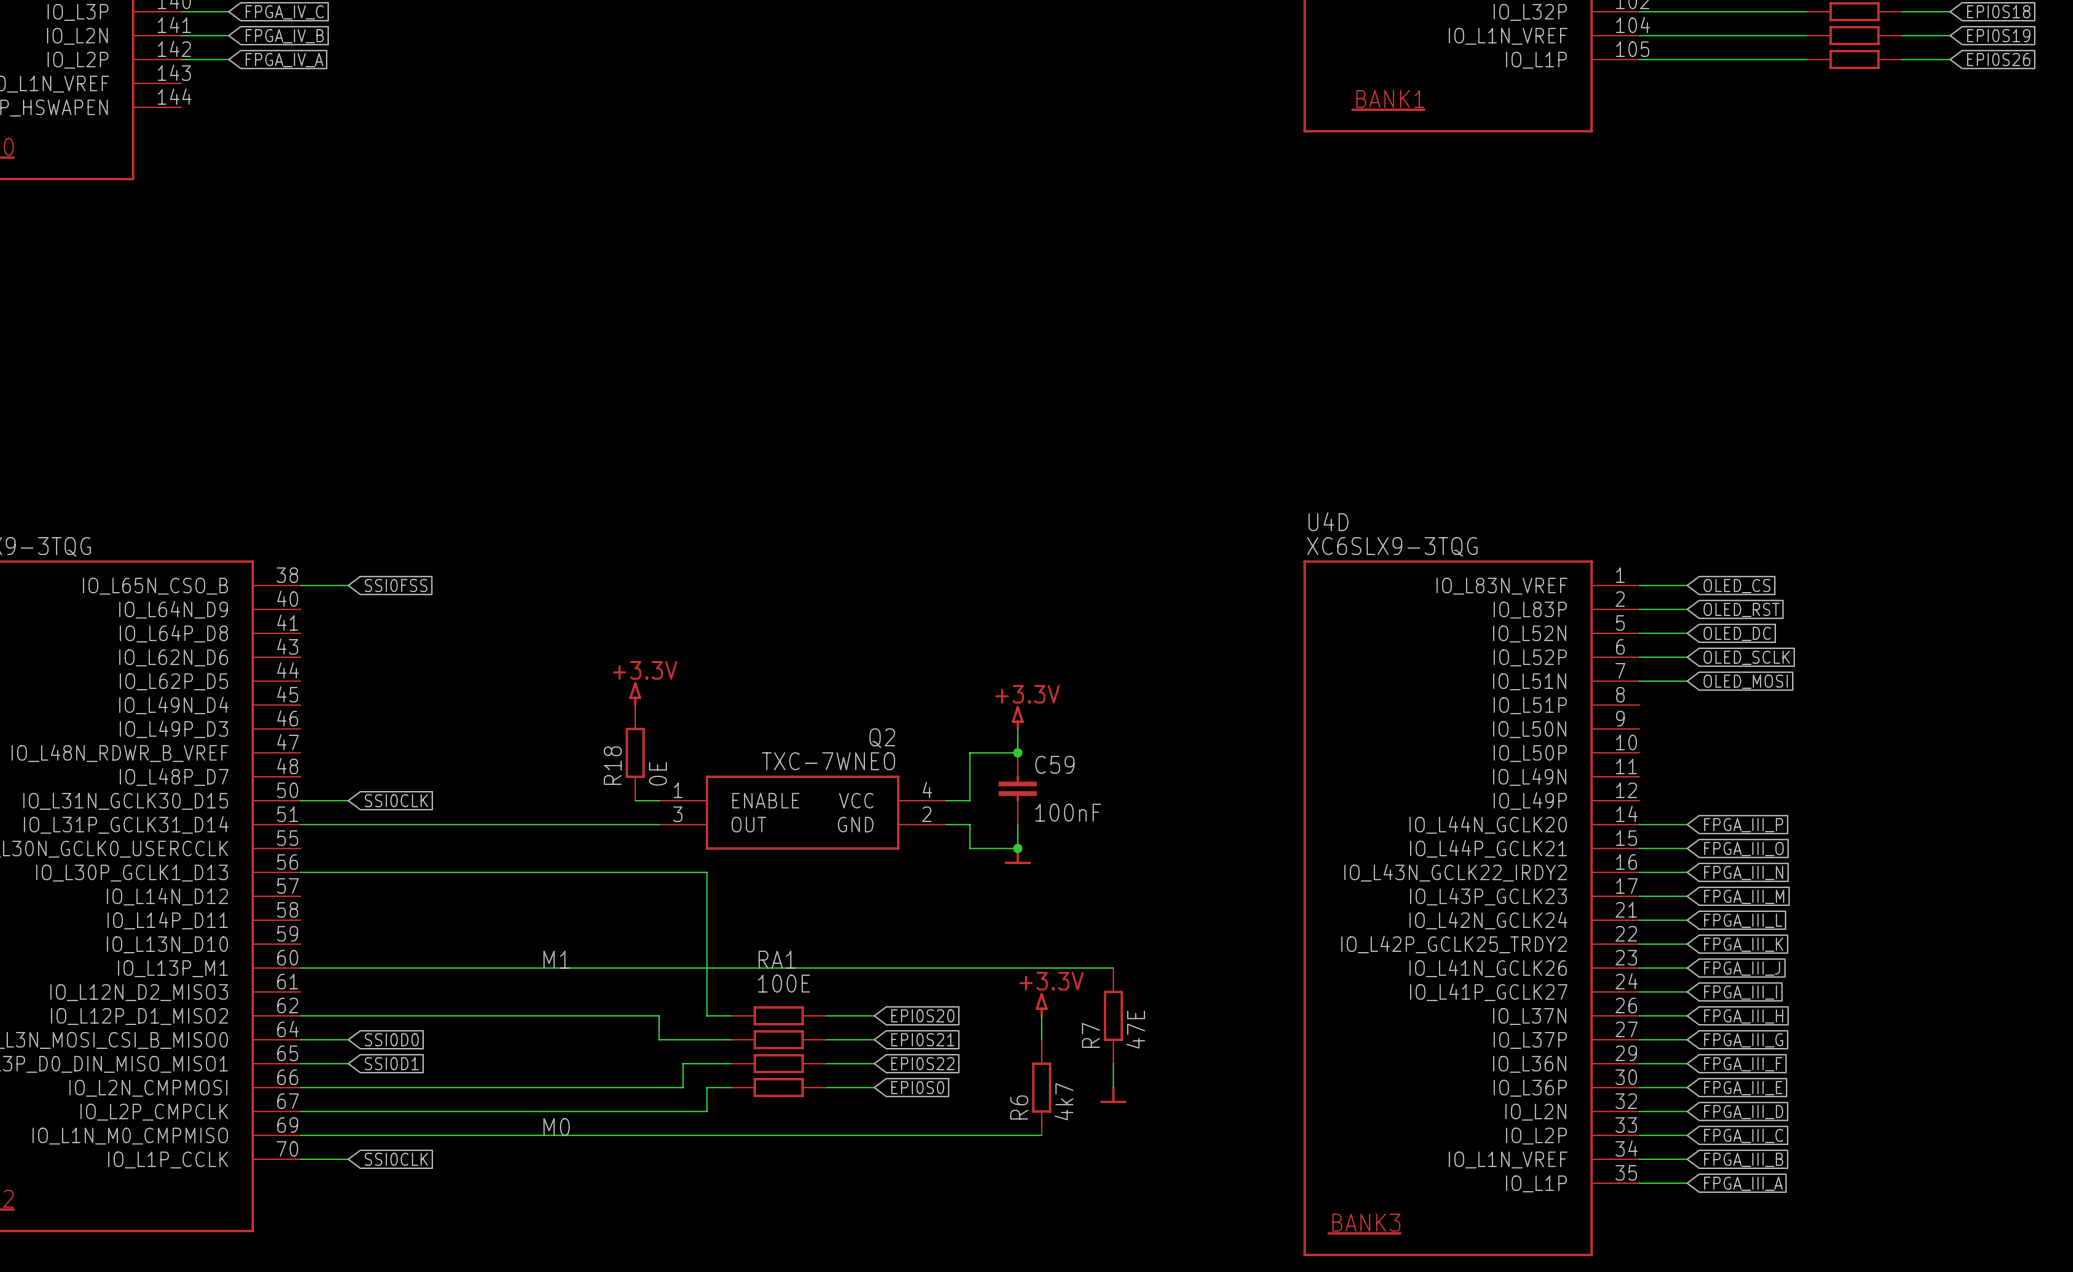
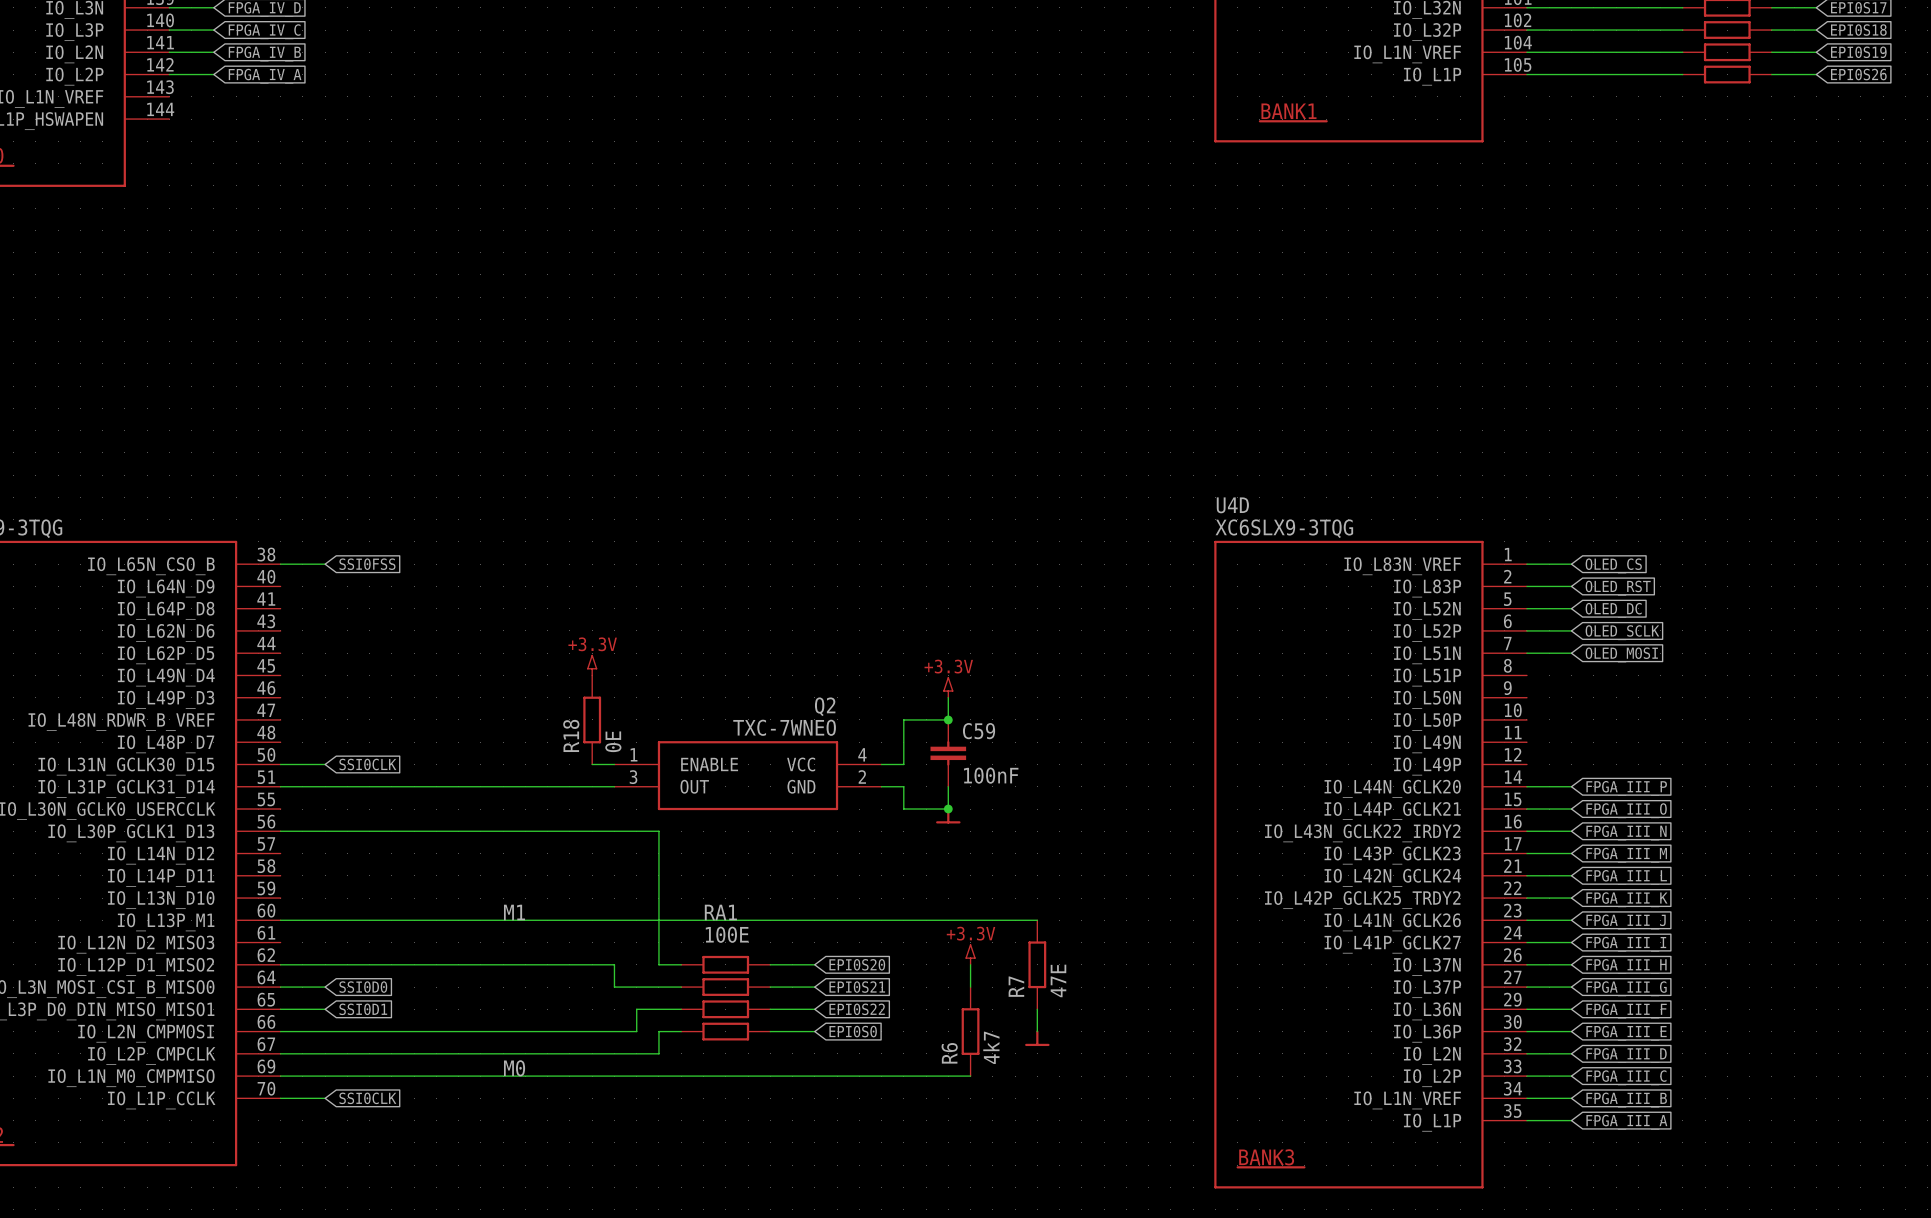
power symbol shape: [629, 682, 642, 707] -> [587, 654, 598, 677]
power symbol shape: [1011, 706, 1024, 731] -> [943, 677, 954, 699]
power symbol shape: [1035, 993, 1048, 1018] -> [965, 944, 976, 966]

